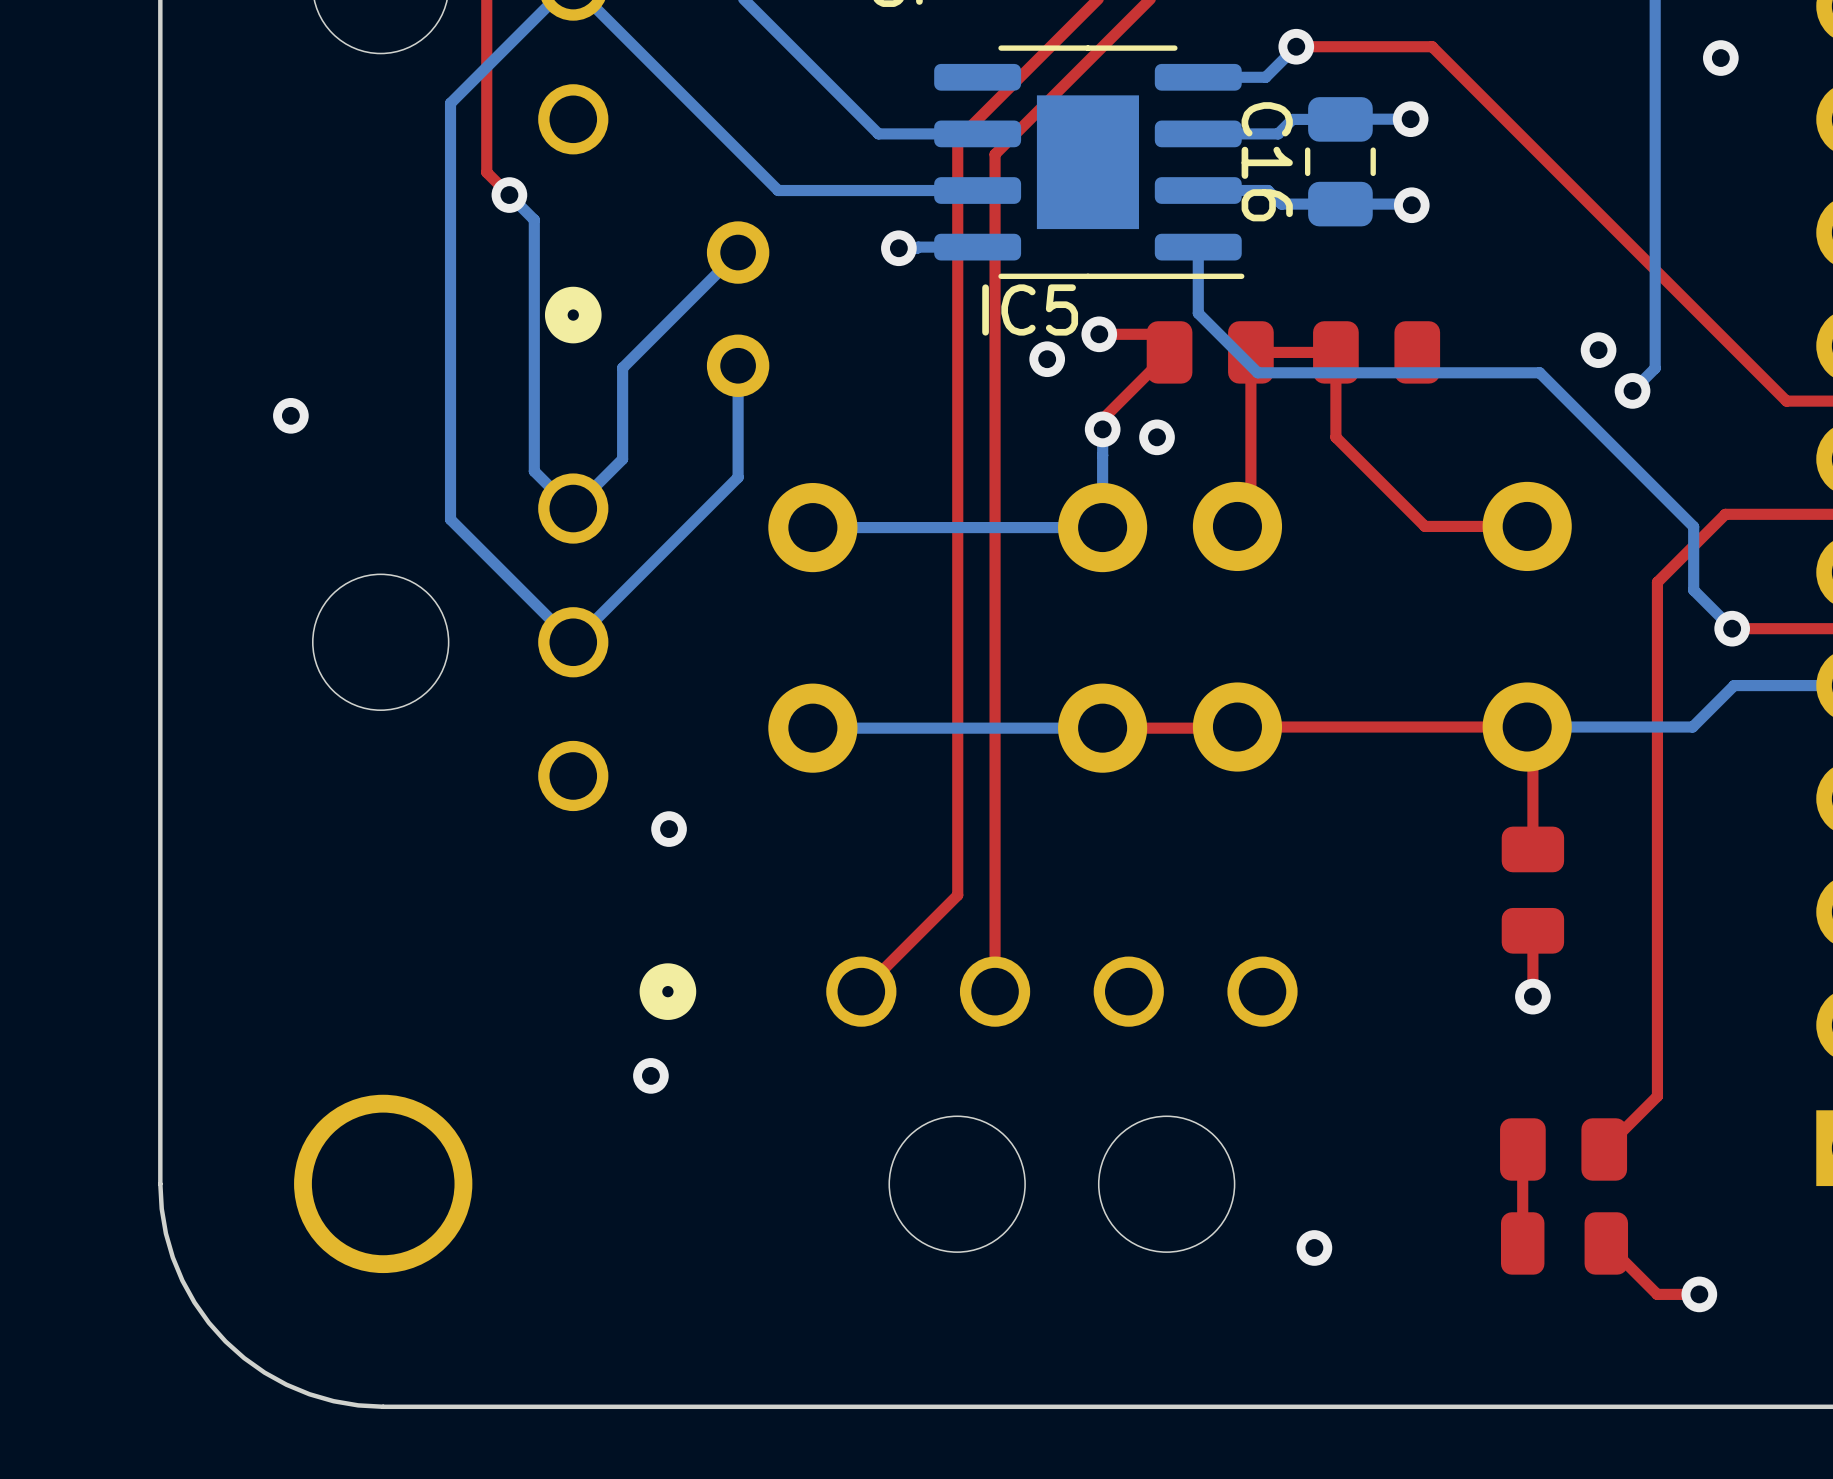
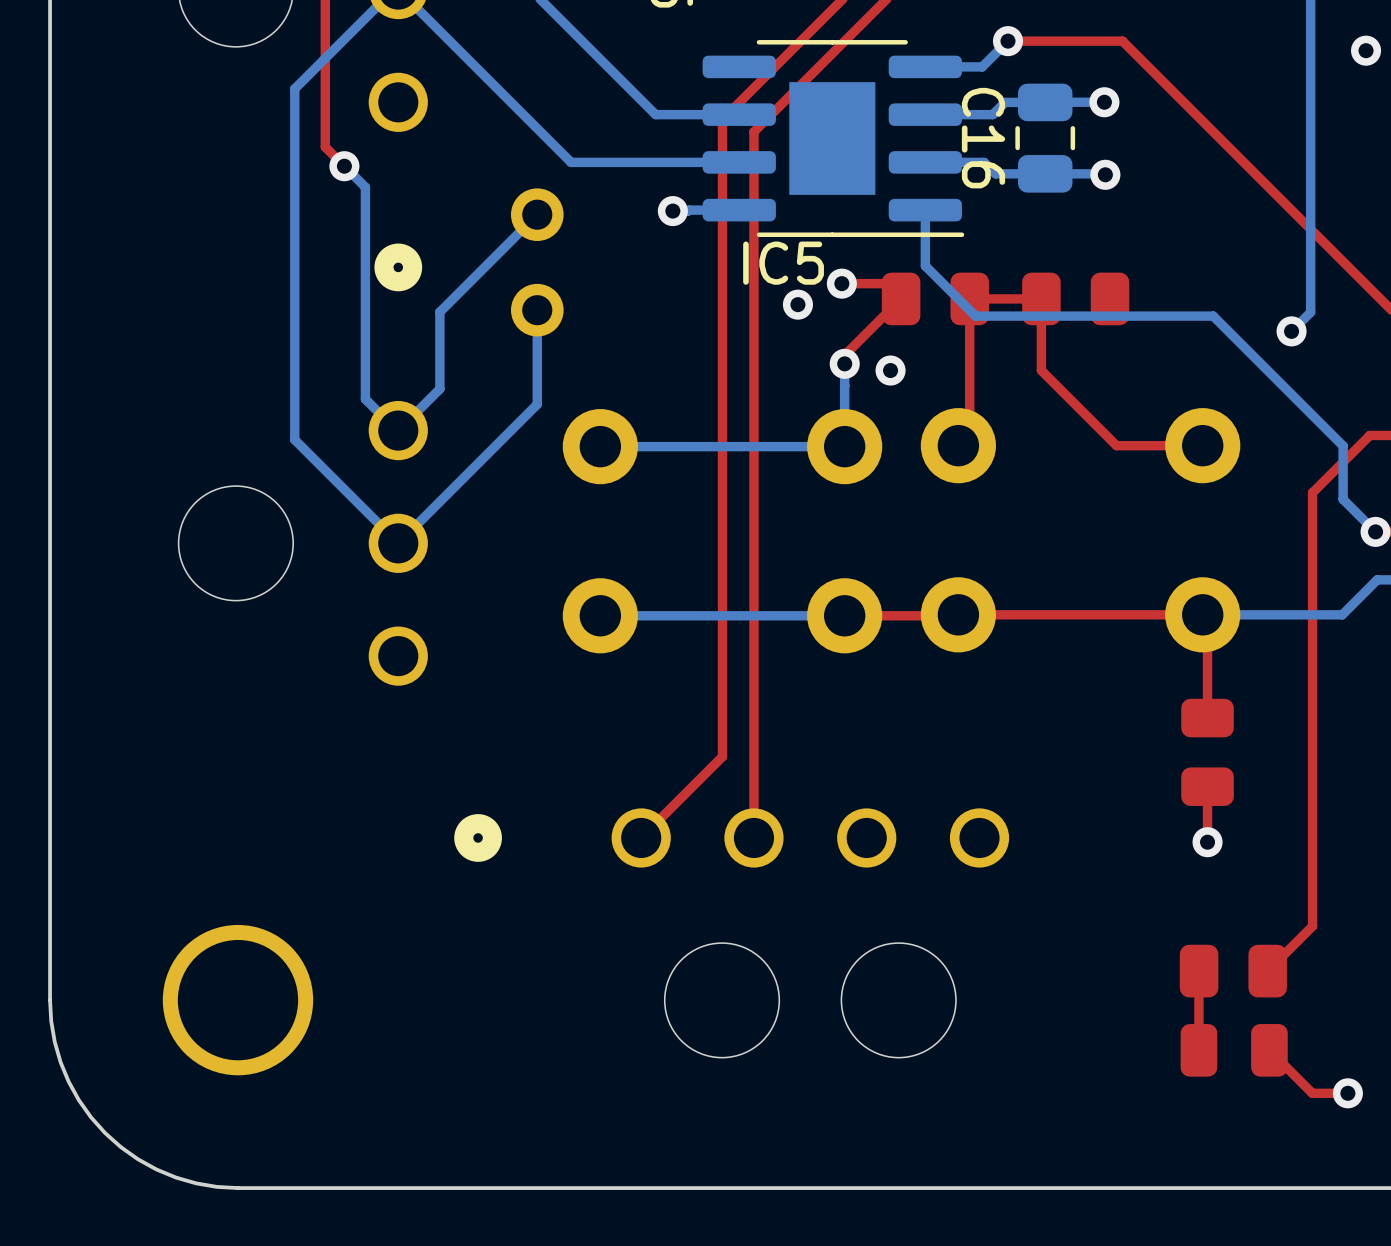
via: (1598, 350) -> none
via: (290, 415) -> none
via: (669, 829) -> none
via: (650, 1075) -> none
via: (1314, 1247) -> none

